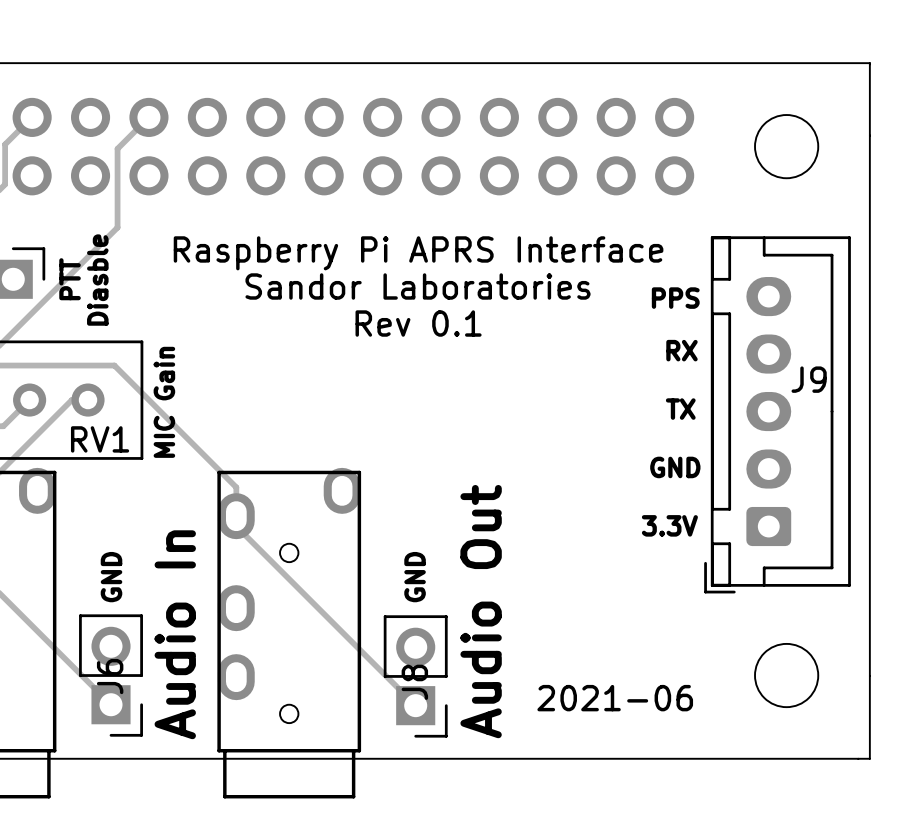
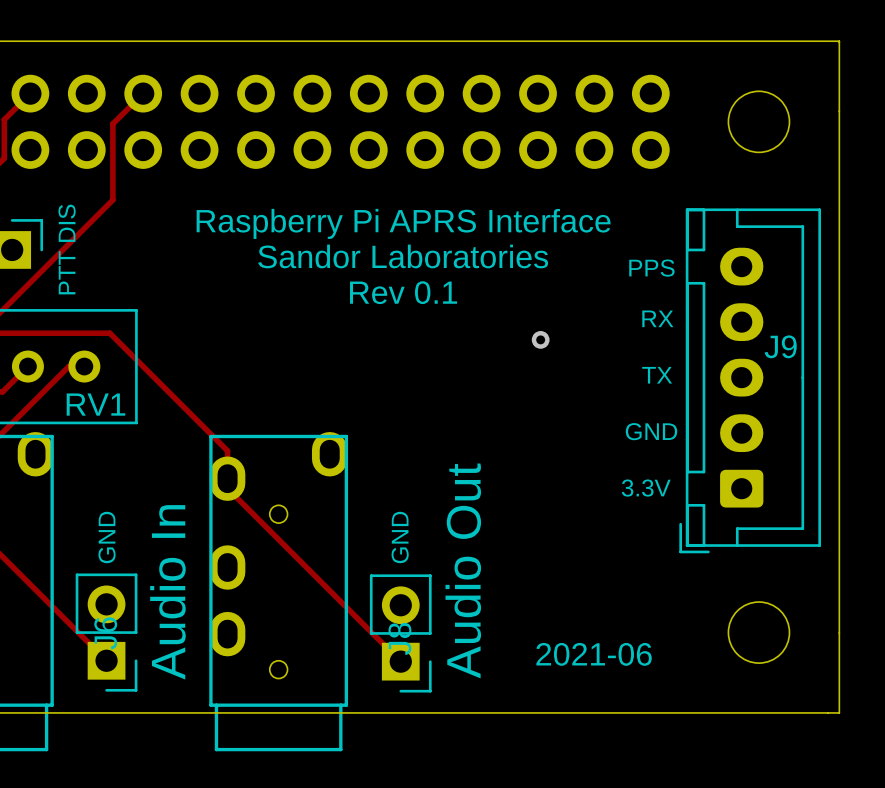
text: PTT (70, 279) -> PTT DIS (67, 249)
text: Diasble (97, 280) -> none
via: none -> (540, 339)
text: MIC Gain (164, 402) -> none

